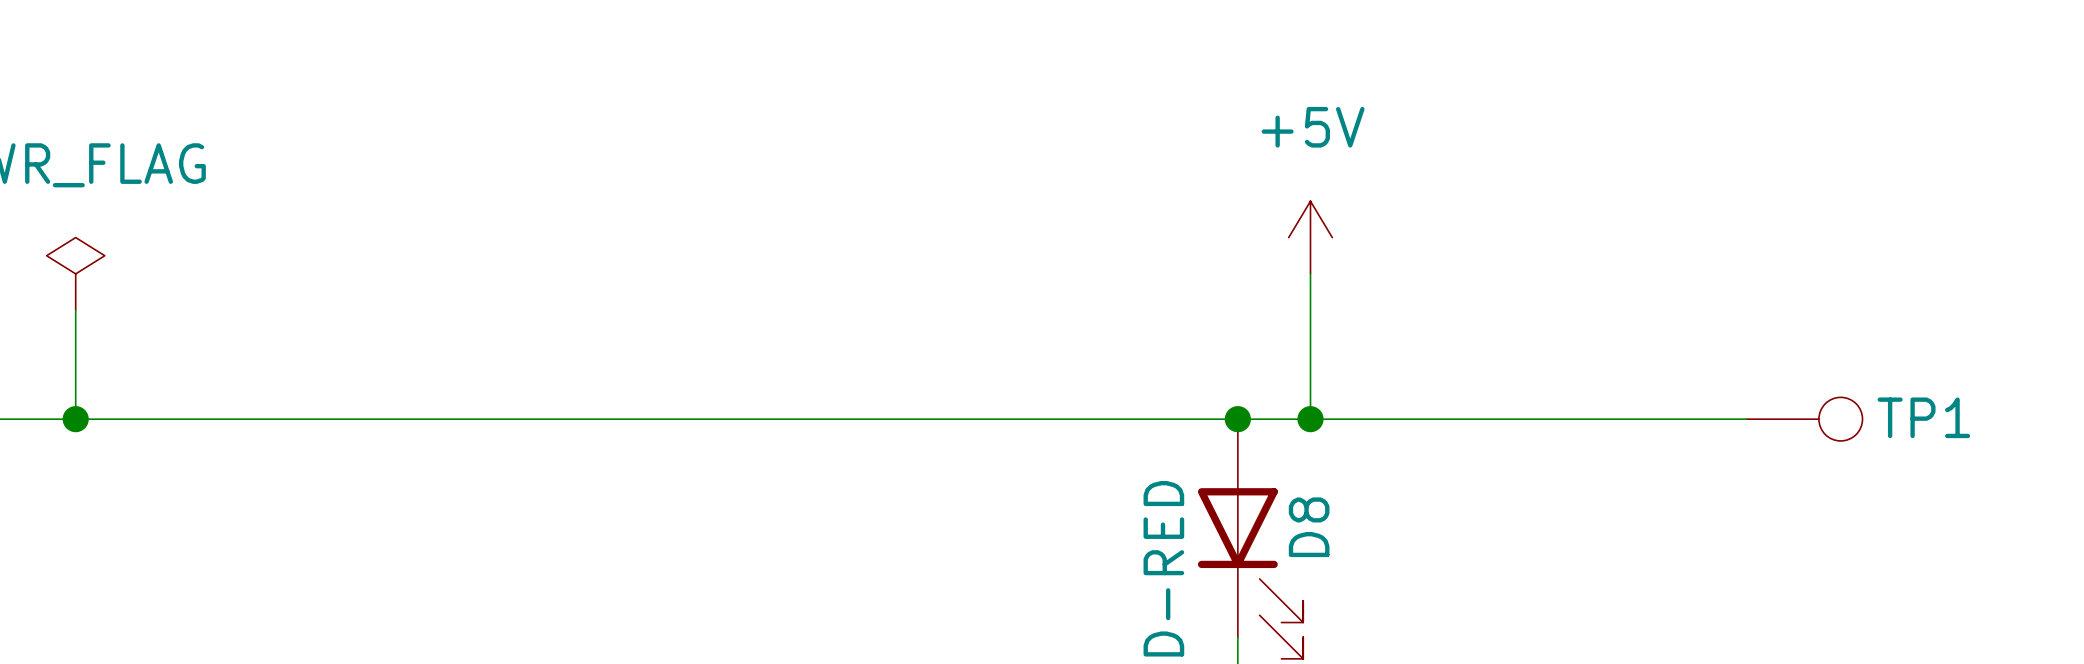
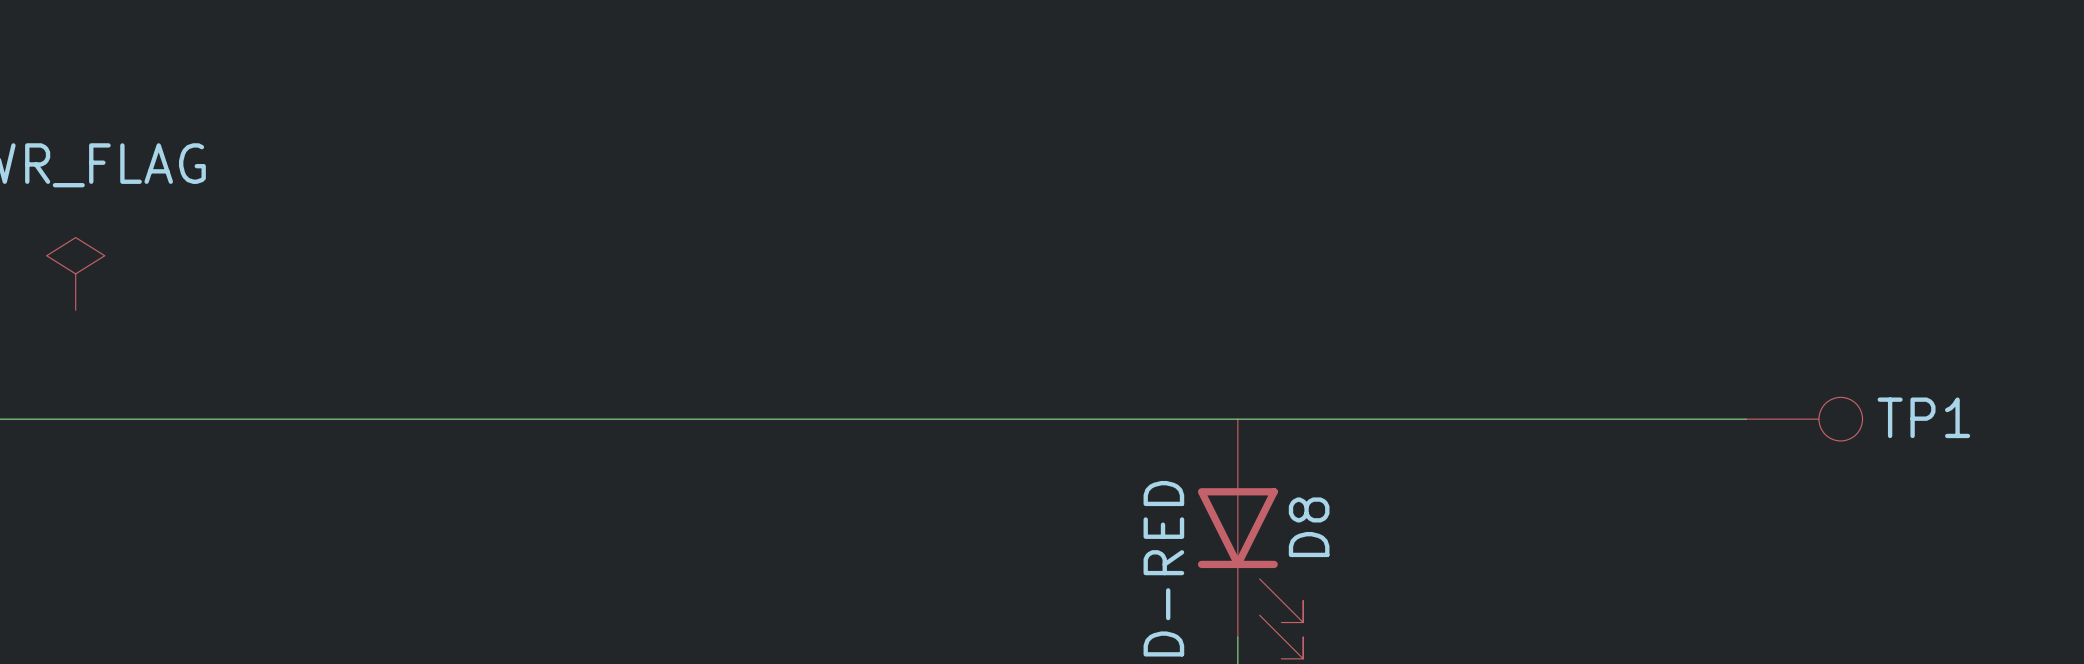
power symbol: +5V (1310, 237) -> none
wire: (1310, 273) (1310, 419) -> none
wire: (75, 310) (75, 419) -> none
junction: (75, 419) -> none
junction: (1237, 419) -> none
junction: (1310, 419) -> none

